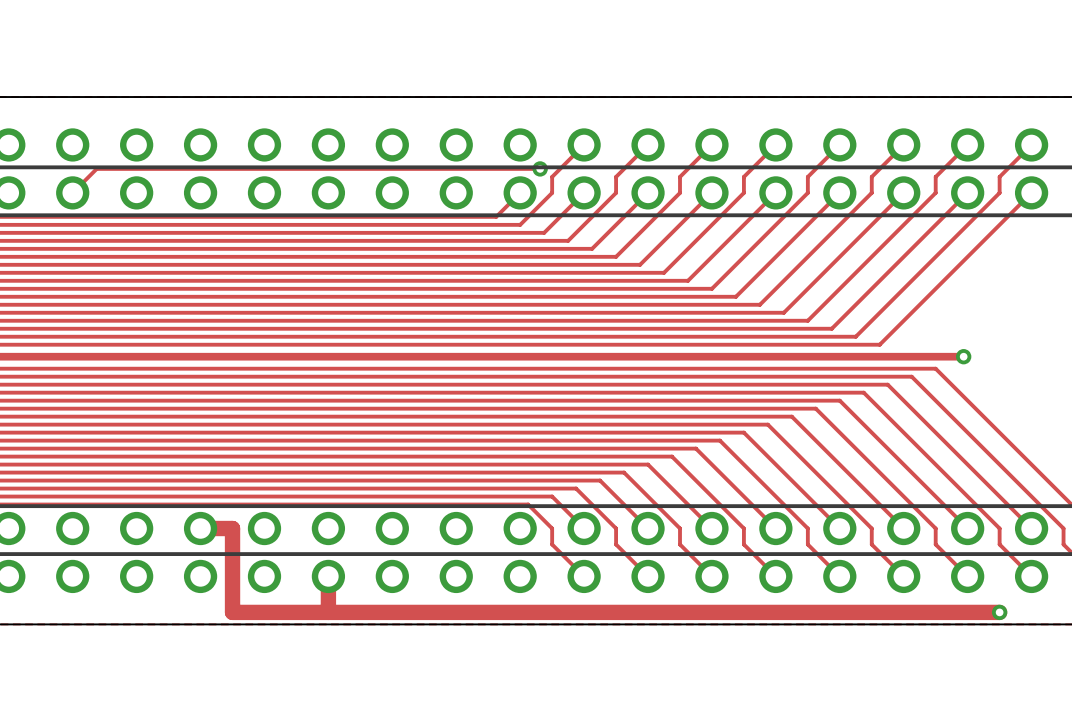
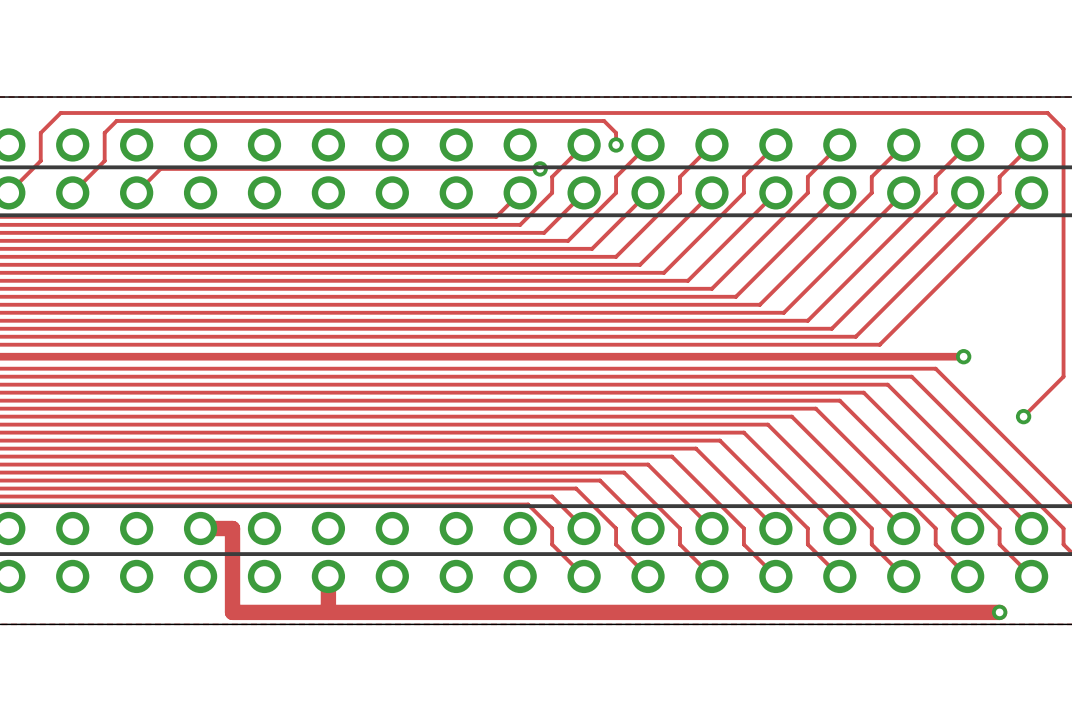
track: none -> (616, 144) (616, 132) (604, 120) (116, 120) (104, 132) (104, 160) (96, 168)
via: none -> (616, 144)
track: (96, 168) (160, 168) -> (136, 192) (160, 168)
track: none -> (8, 192) (40, 160) (40, 132) (60, 112) (1047, 112) (1063, 128) (1063, 376) (1023, 416)
via: none -> (1023, 416)

